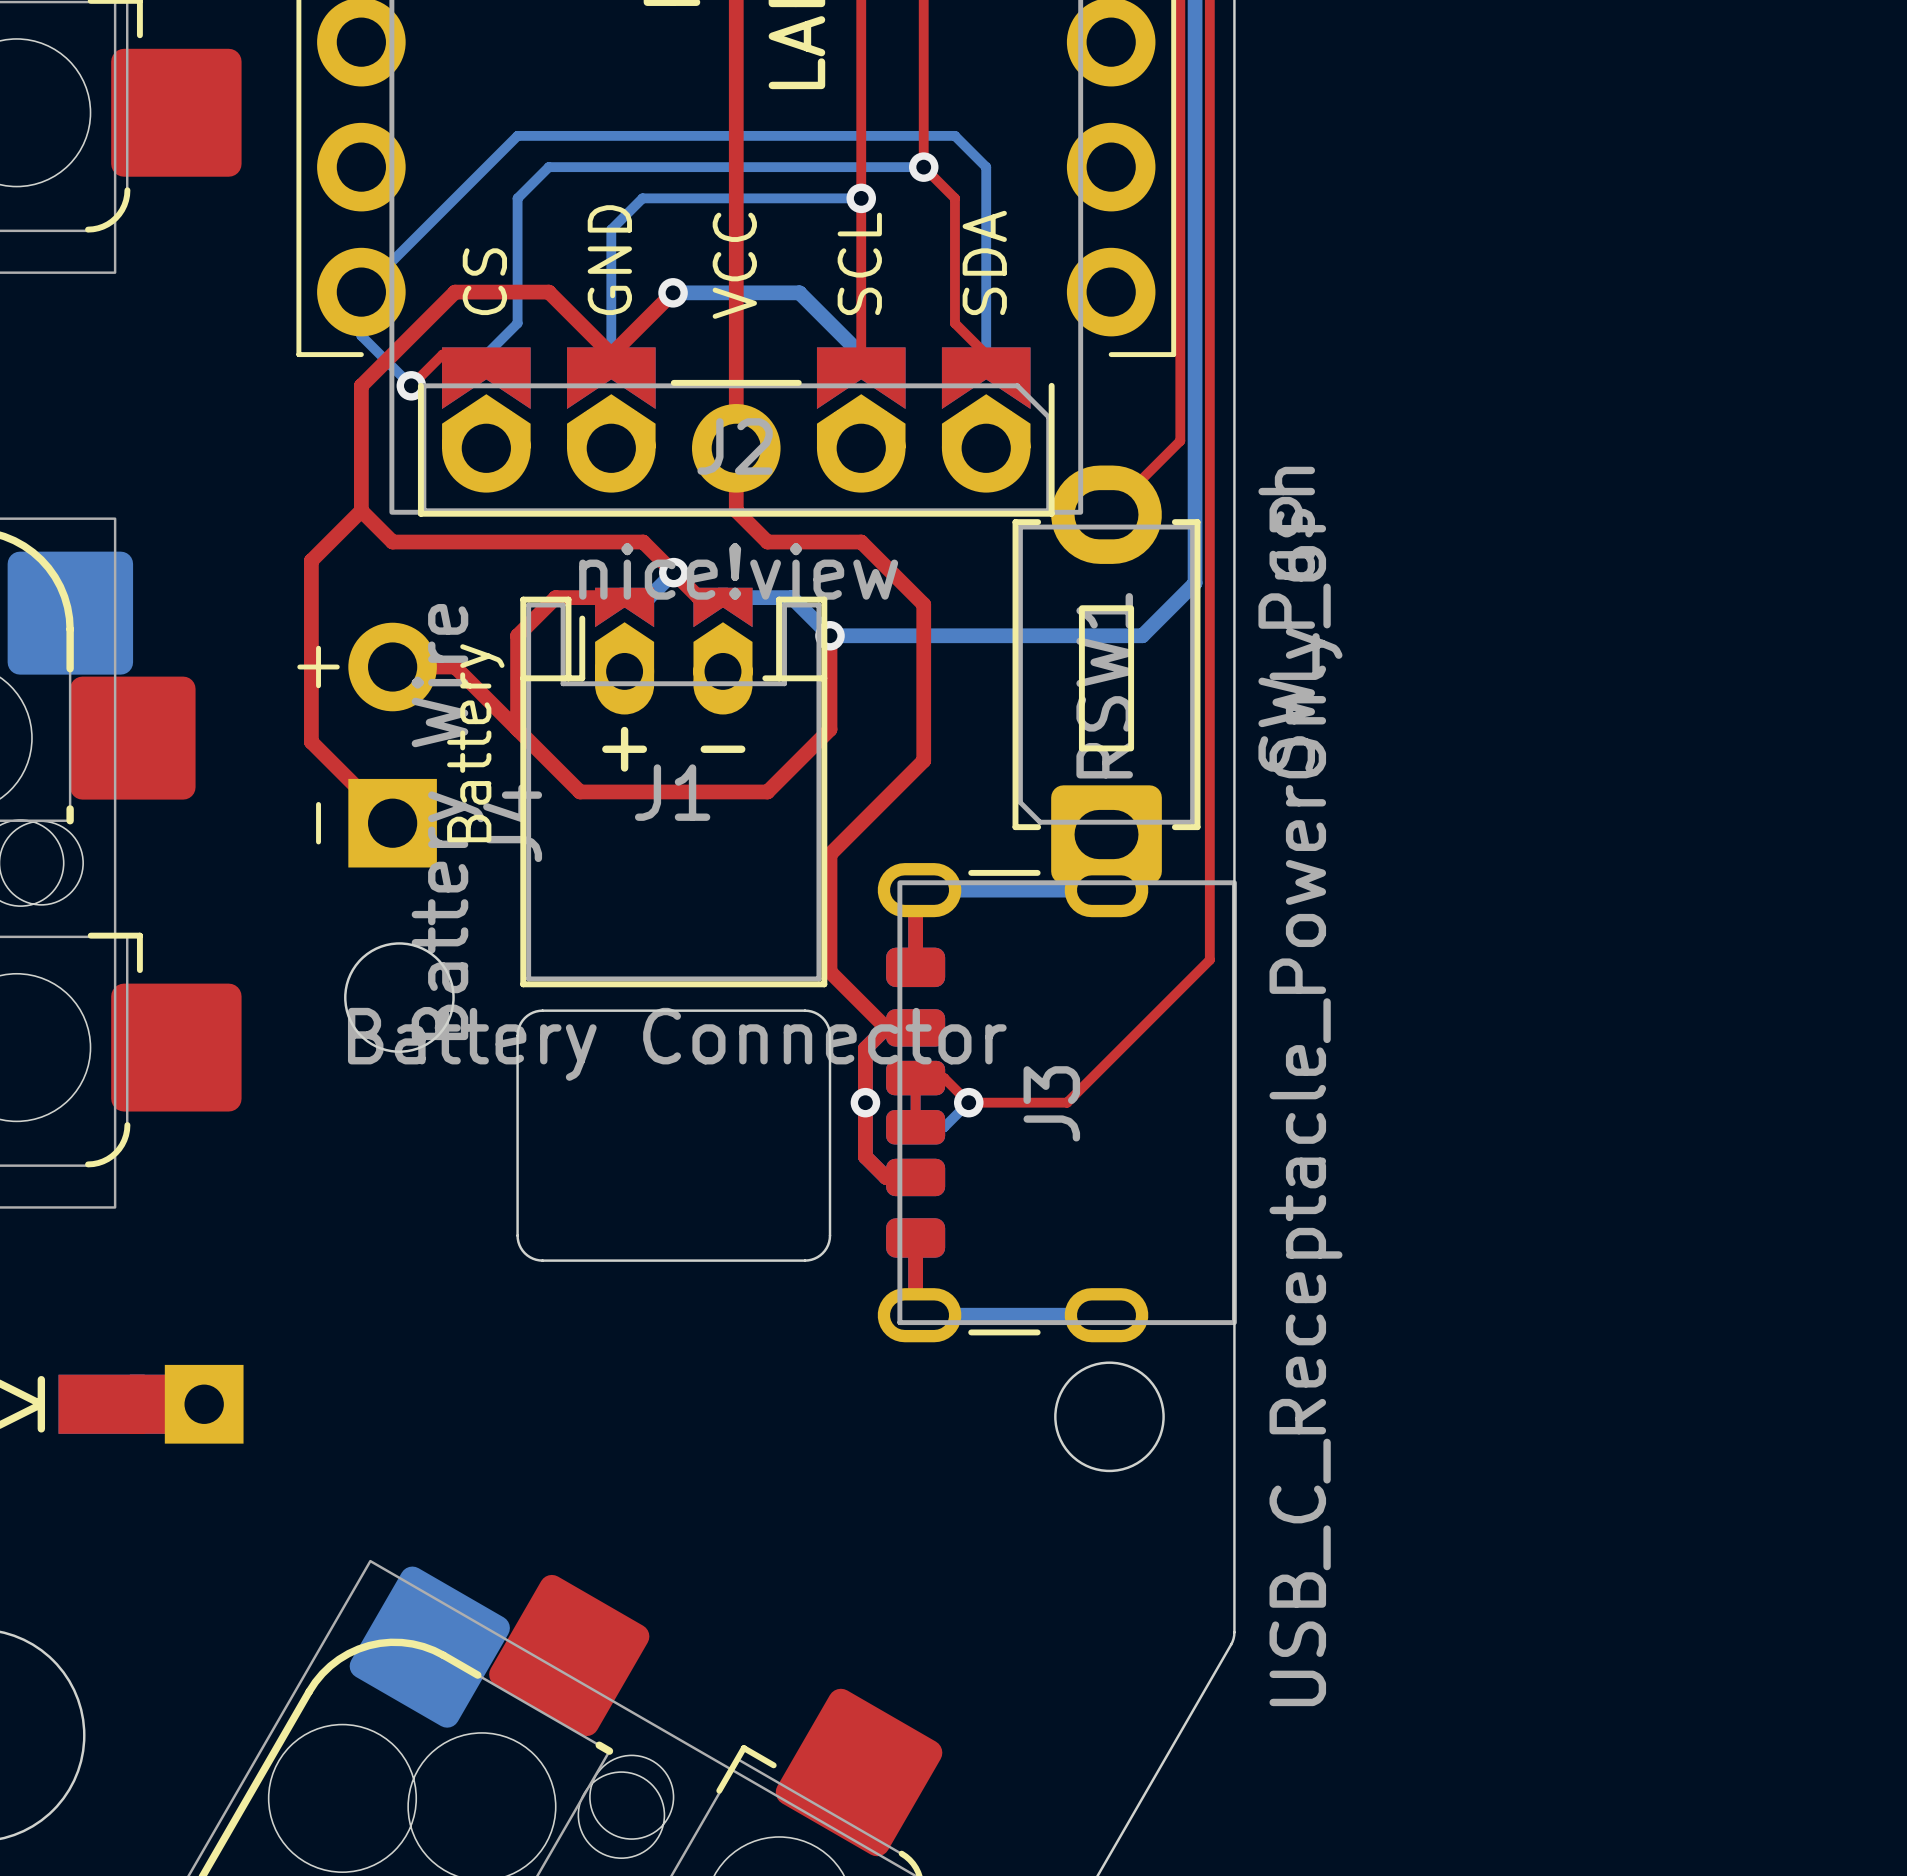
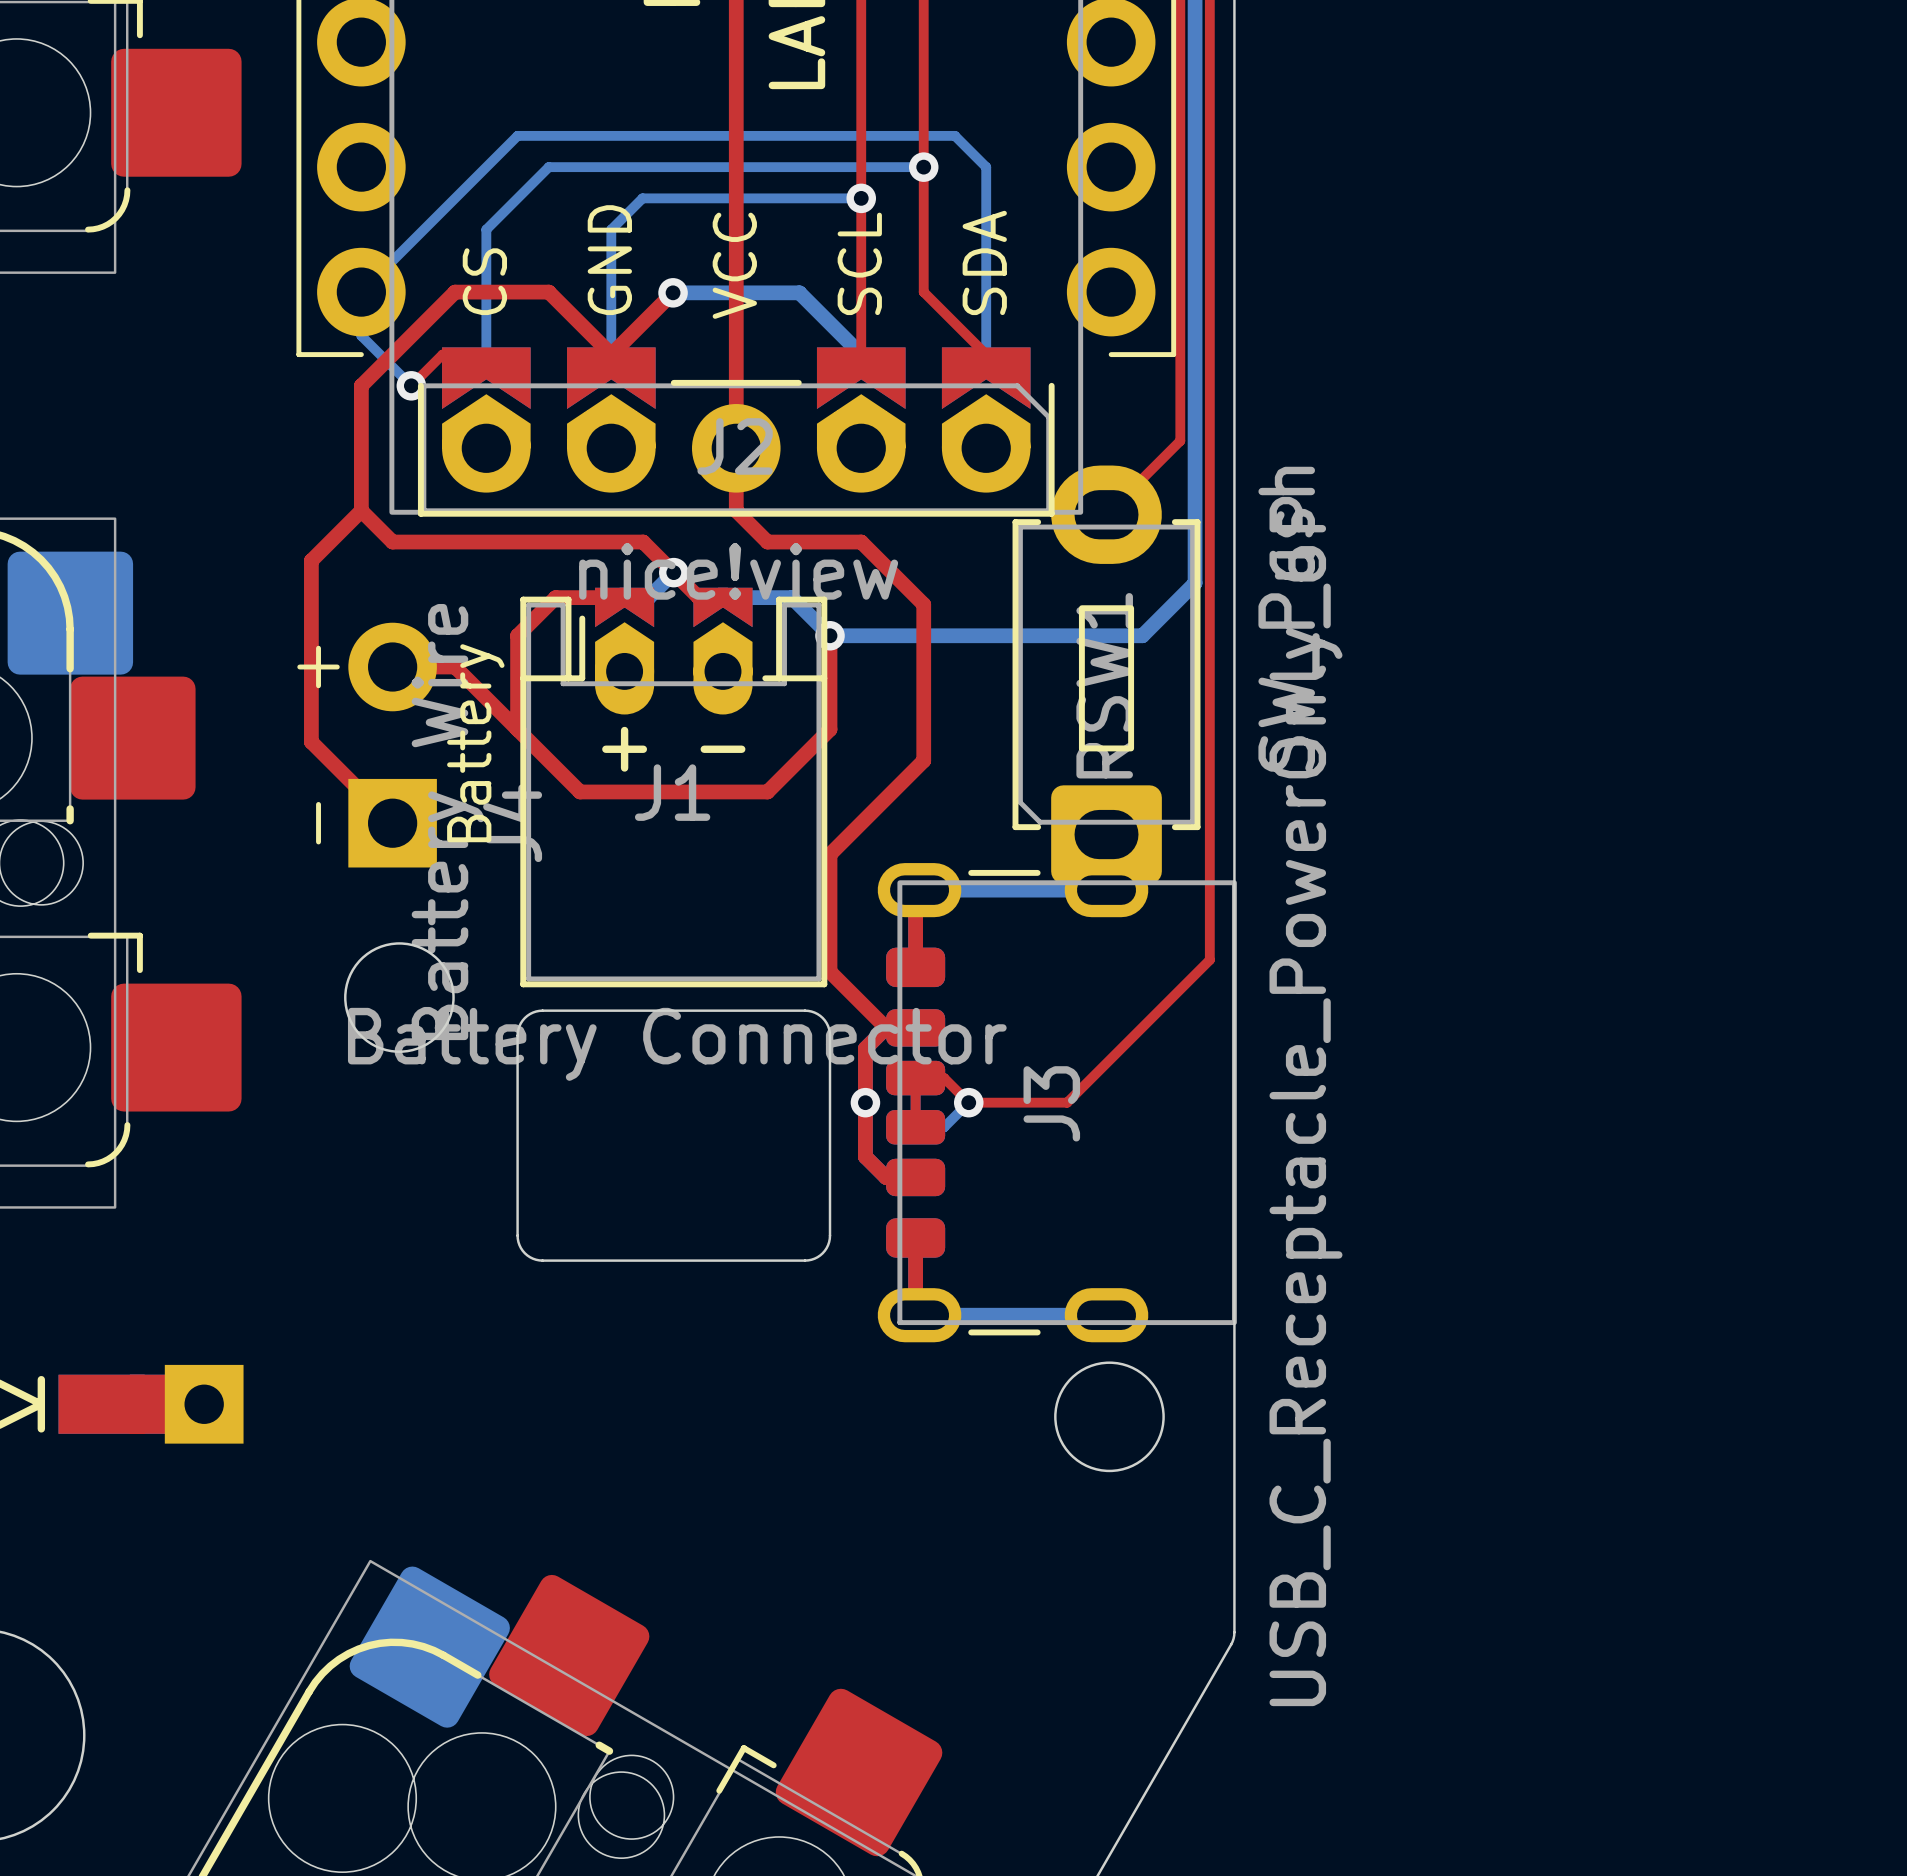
top track: (923, 167) (954, 198) (954, 323) -> (923, 167) (923, 292) (954, 323)
bottom track: (517, 198) (517, 323) (486, 354) -> (517, 198) (486, 229) (486, 354)

